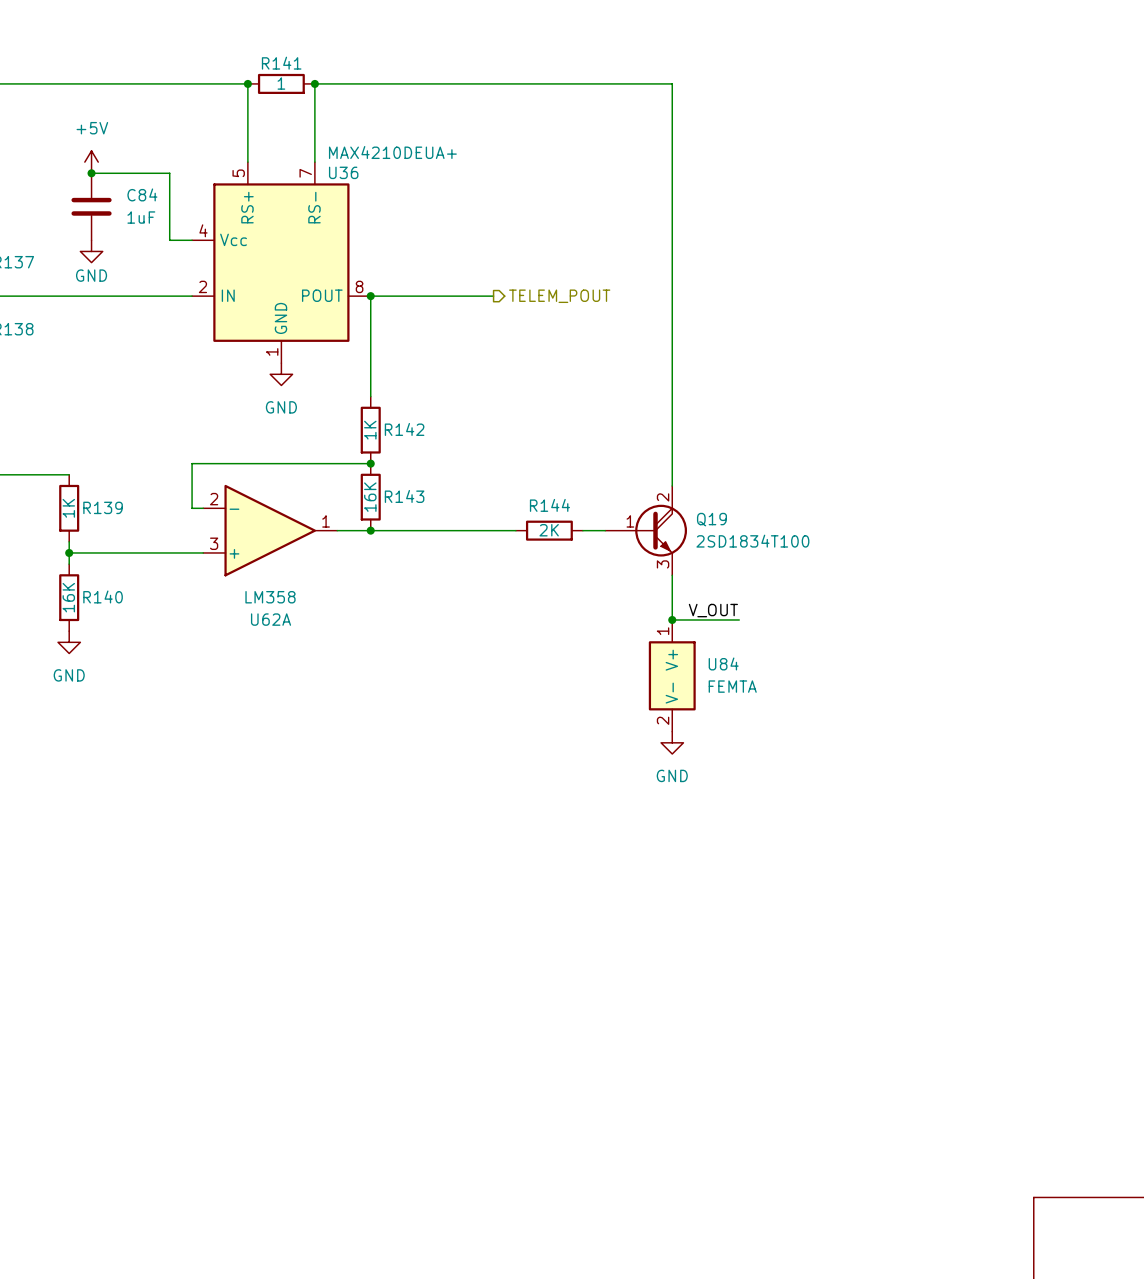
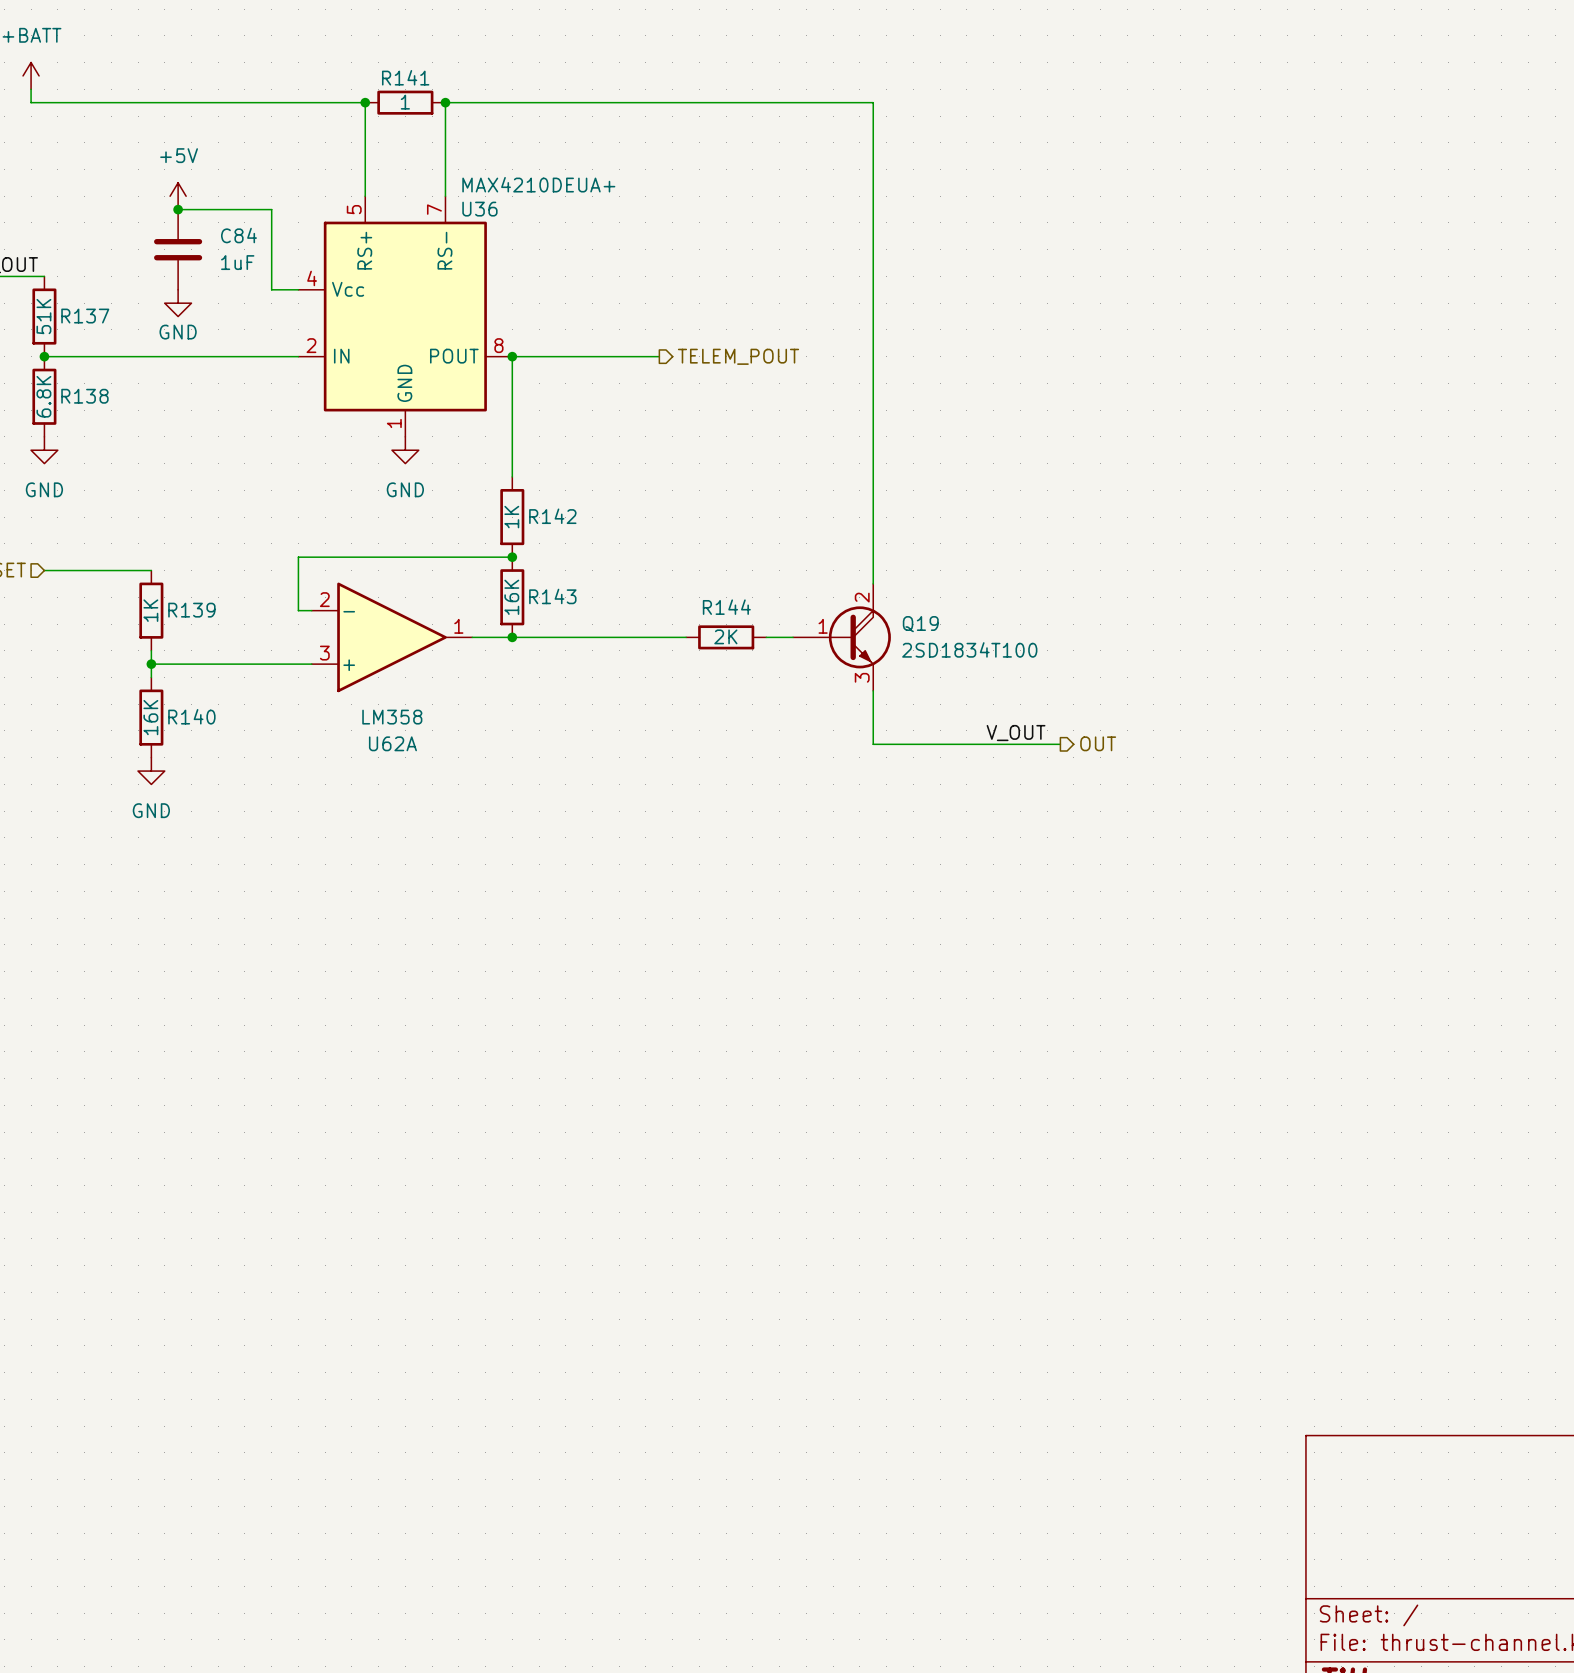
label position: V_OUT (713, 610) -> V_OUT (1016, 733)
junction: (672, 619) -> none
wire: none -> (953, 744) (1060, 744)
hierarchical label: none -> OUT (1098, 743)
U84: FEMTA (672, 675) -> none
power symbol: GND (672, 742) -> none

